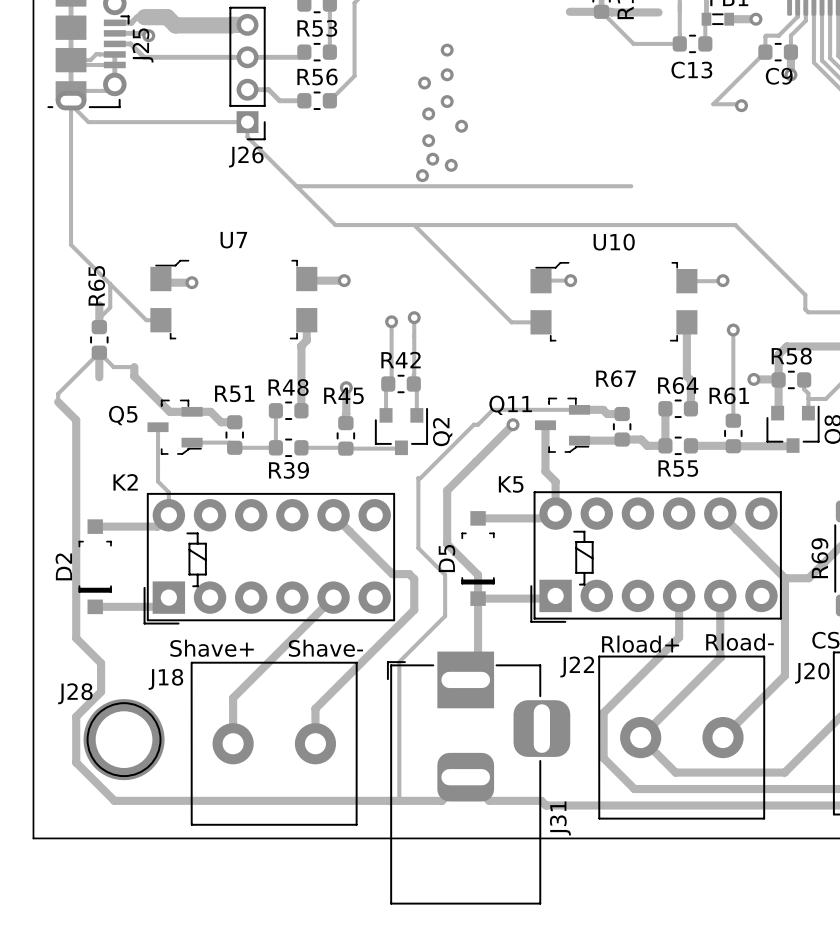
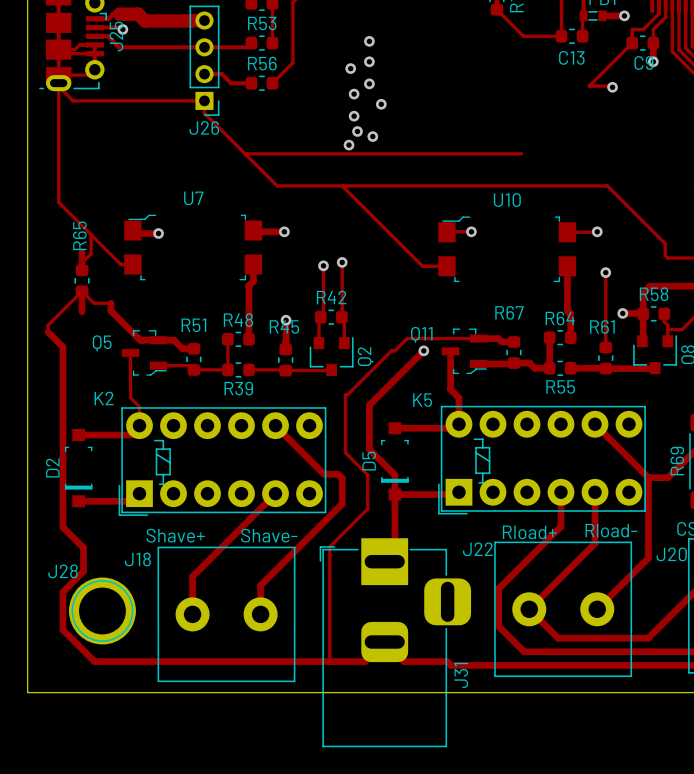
track: (569, 11) (658, 12) -> none

